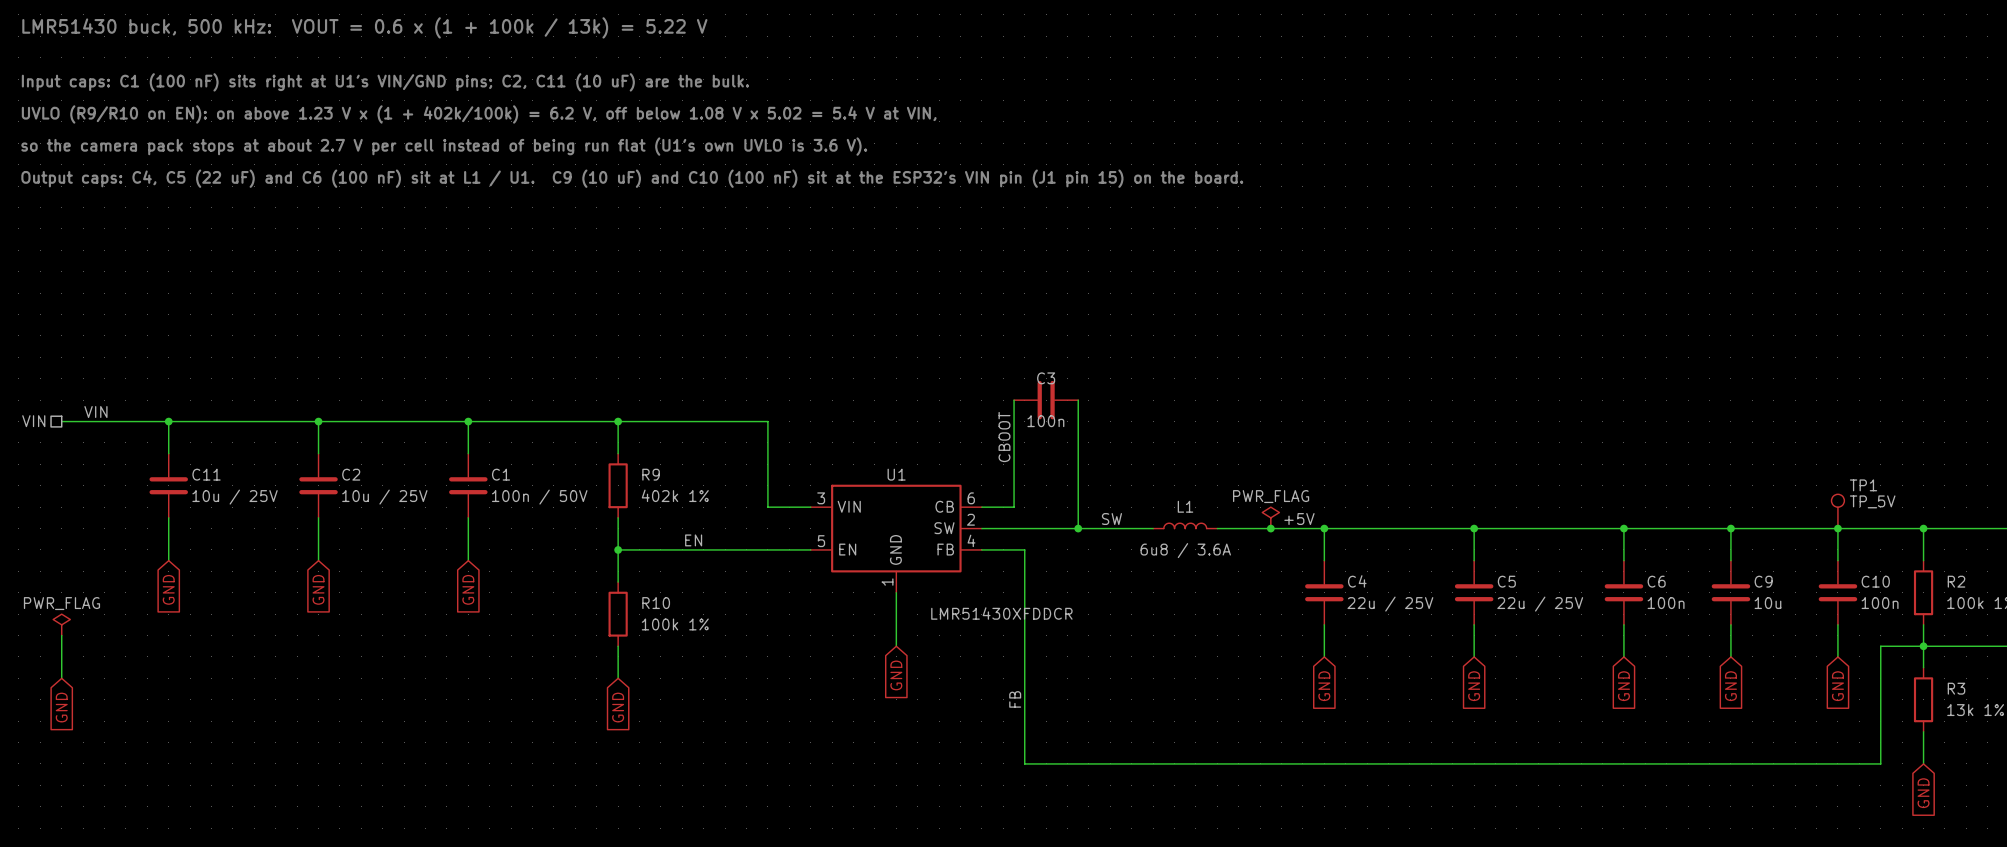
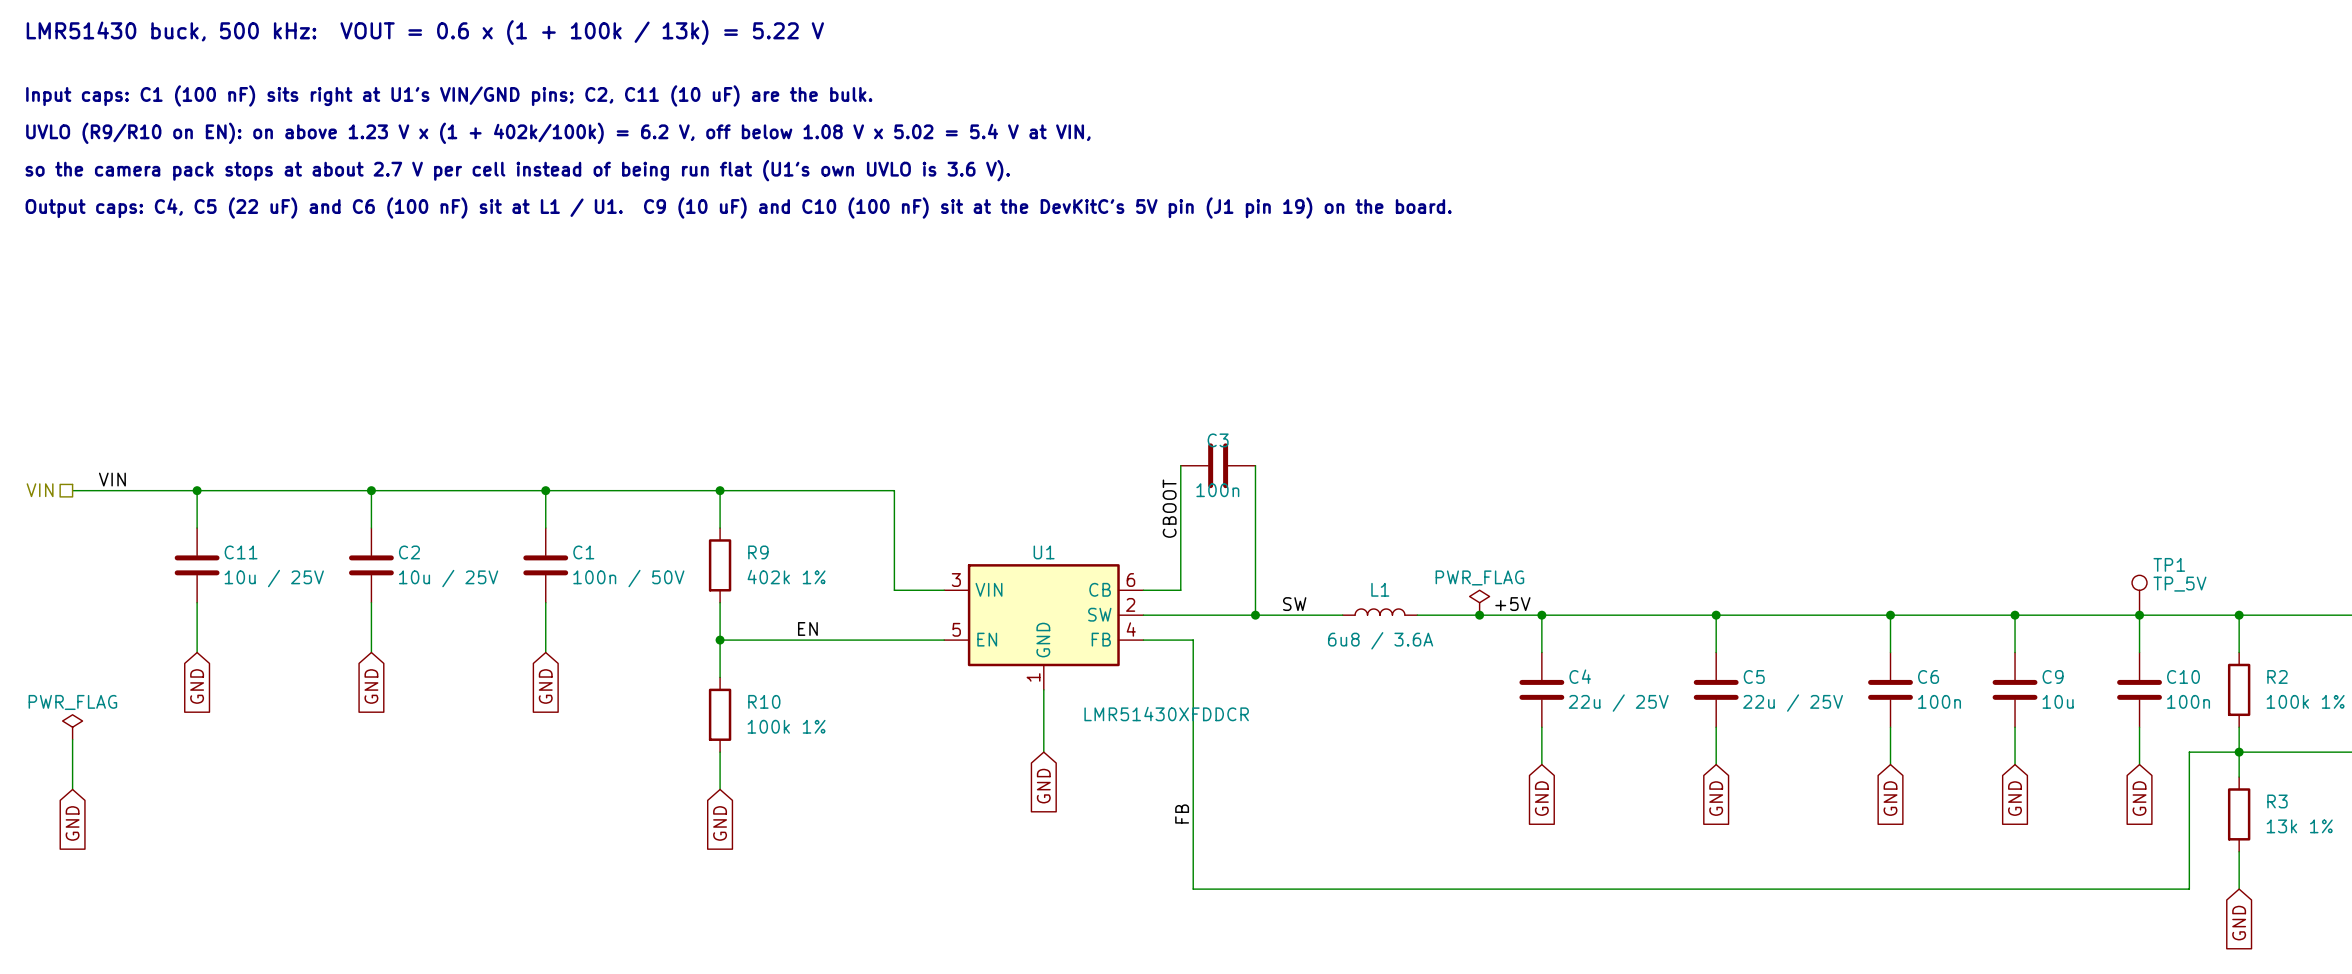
text: Output caps: C4, C5 (22 uF) and C6 (100 nF) sit at L1 / U1. C9 (10 uF) and C10 (100 nF) sit at the ESP32's VIN pin (J1 pin 15) on the board. (632, 178) -> Output caps: C4, C5 (22 uF) and C6 (100 nF) sit at L1 / U1. C9 (10 uF) and C10 (100 nF) sit at the DevKitC's 5V pin (J1 pin 19) on the board. (738, 208)

